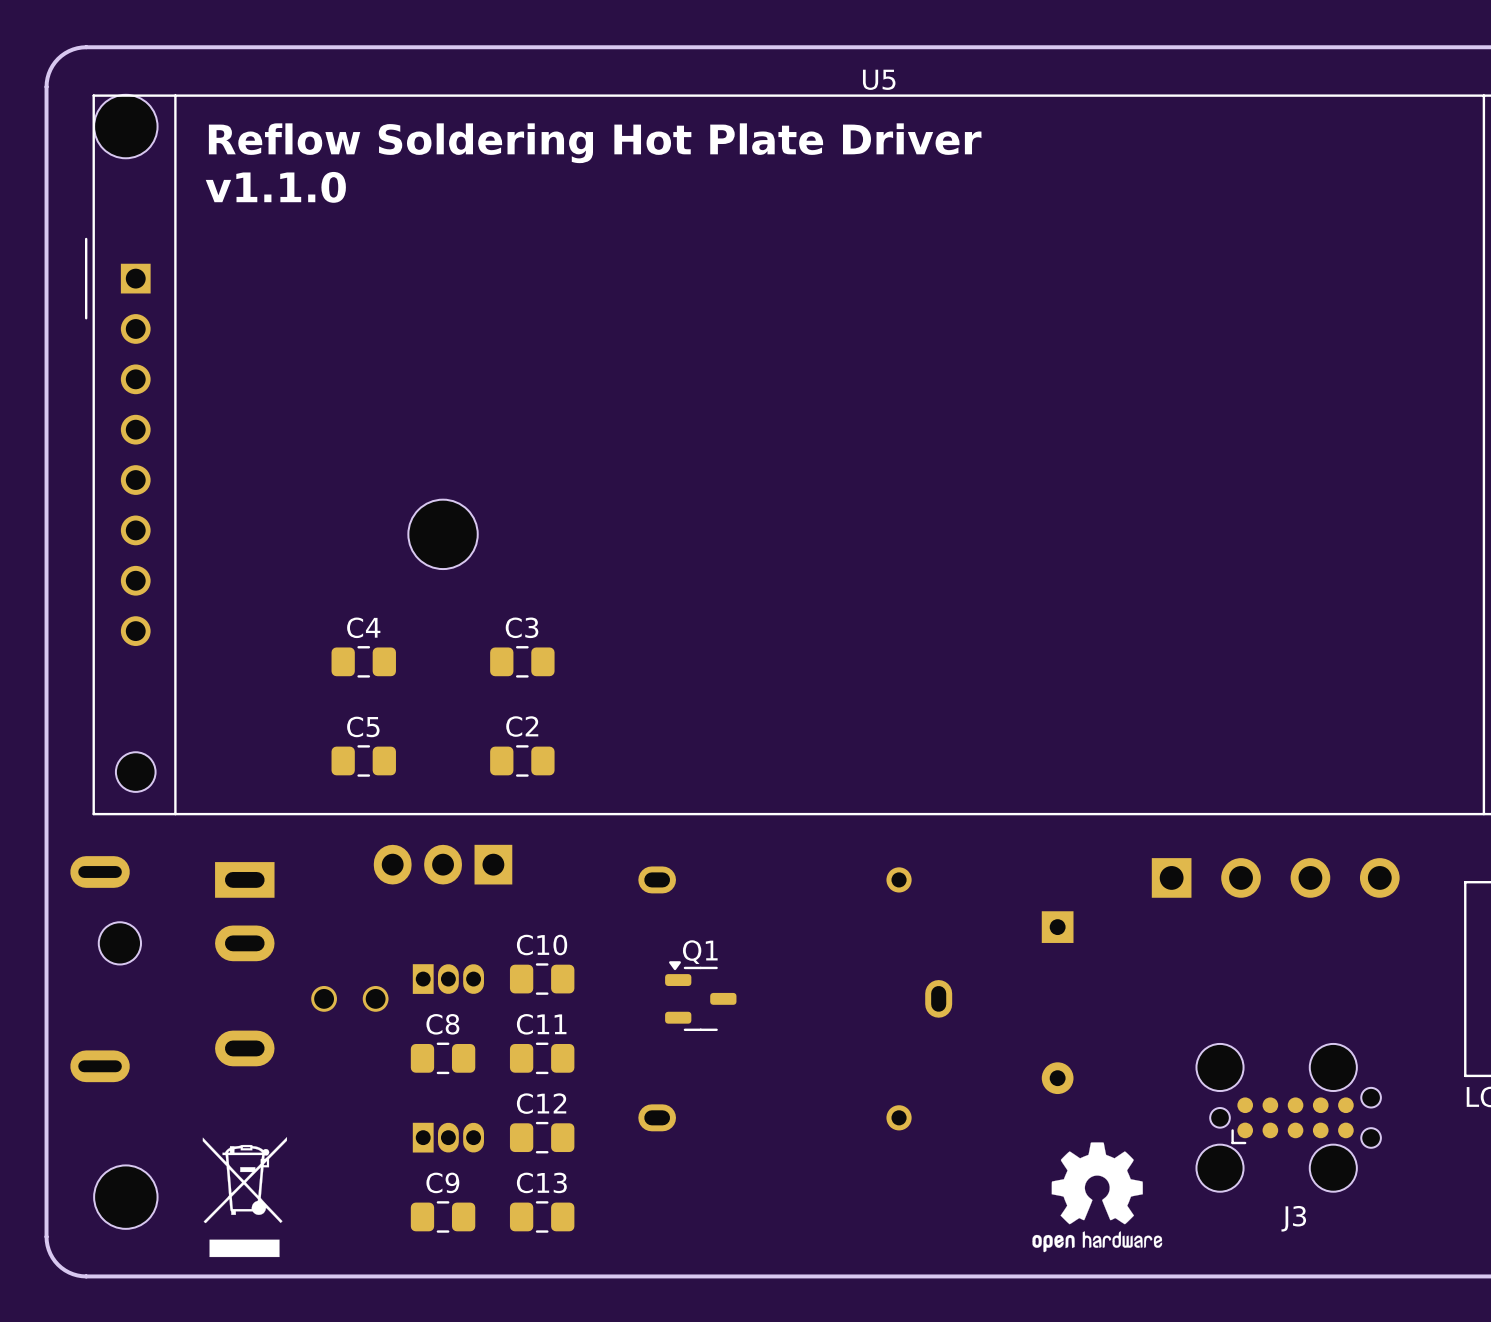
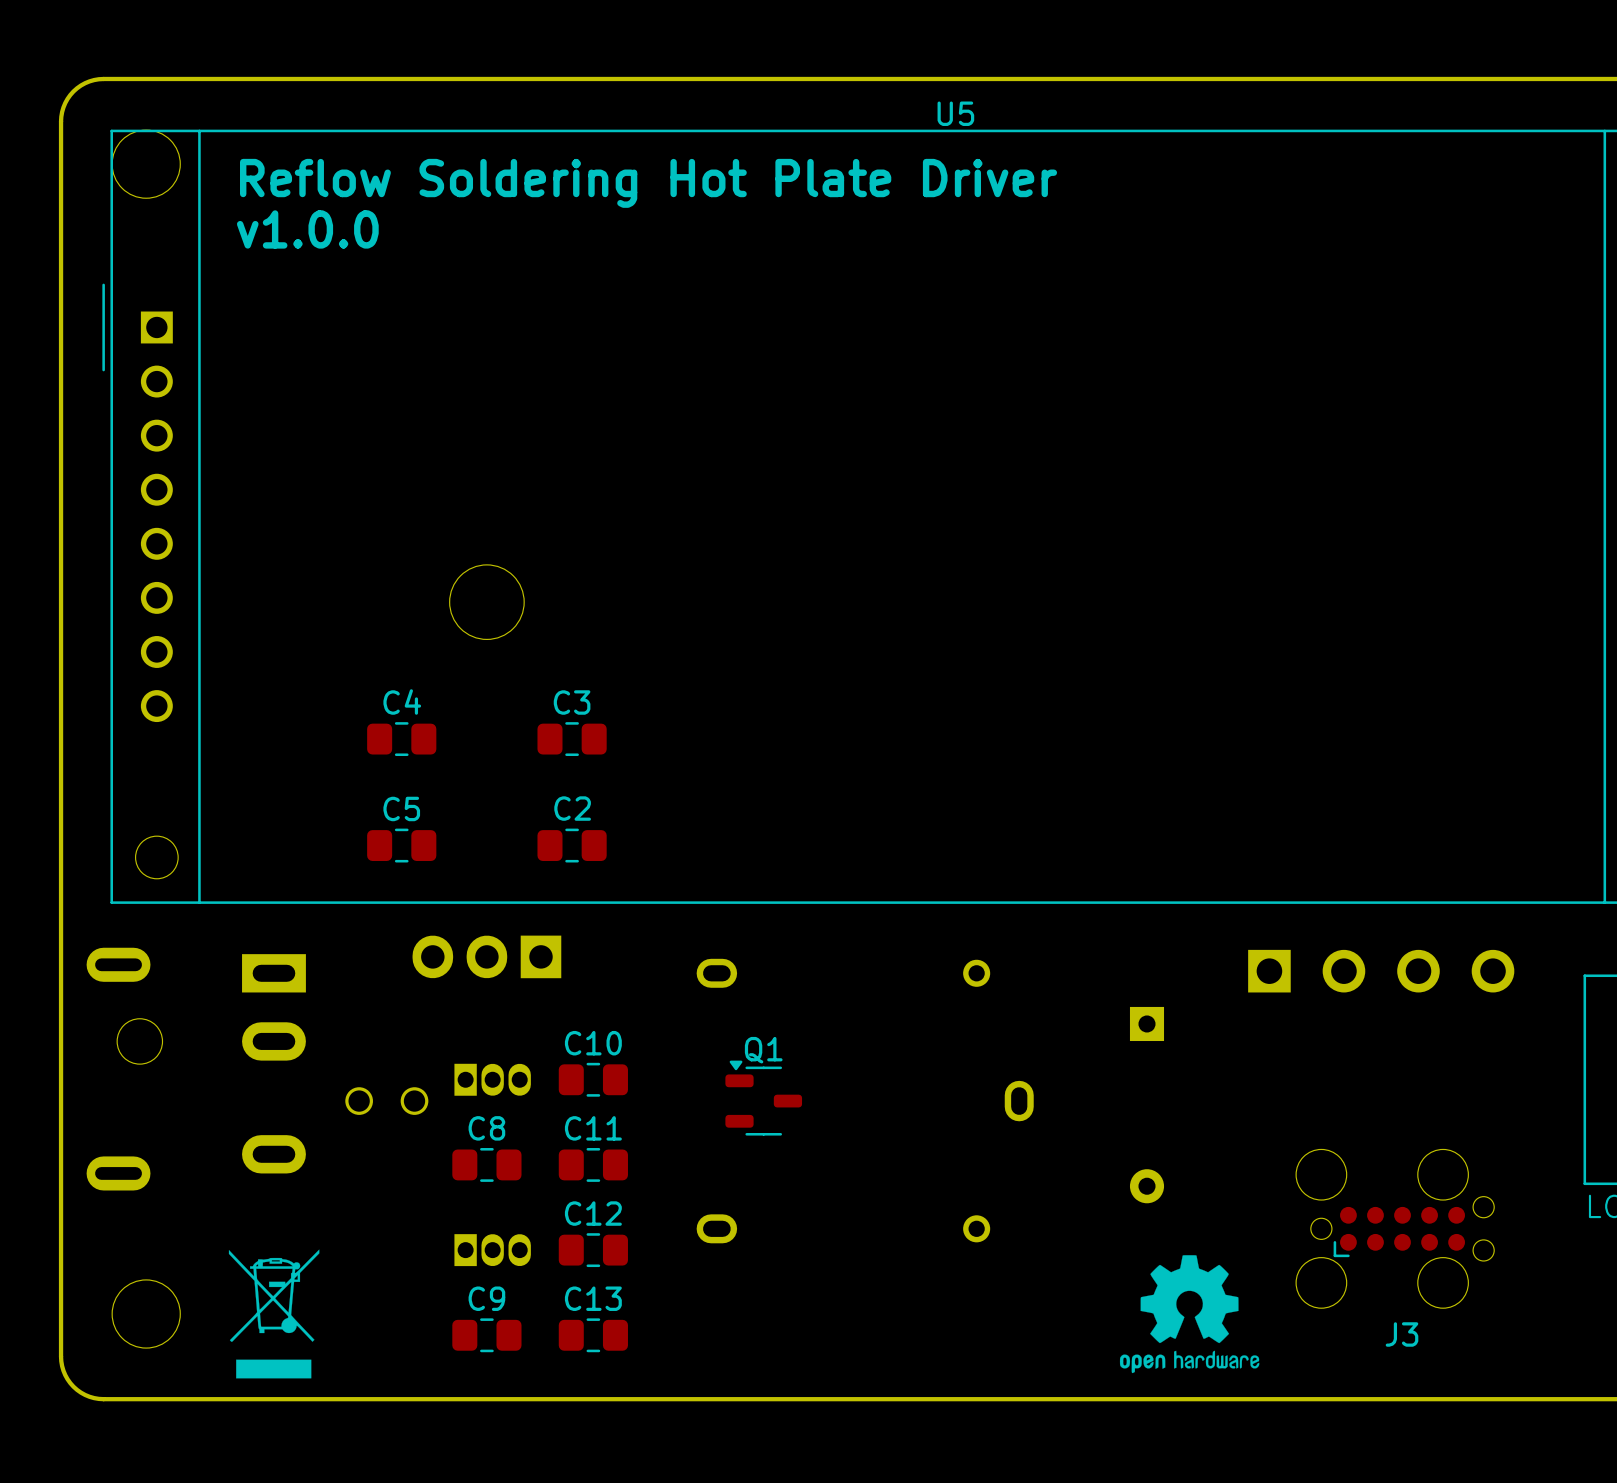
text: v1.1.0 (275, 187) -> v1.0.0 (307, 229)

